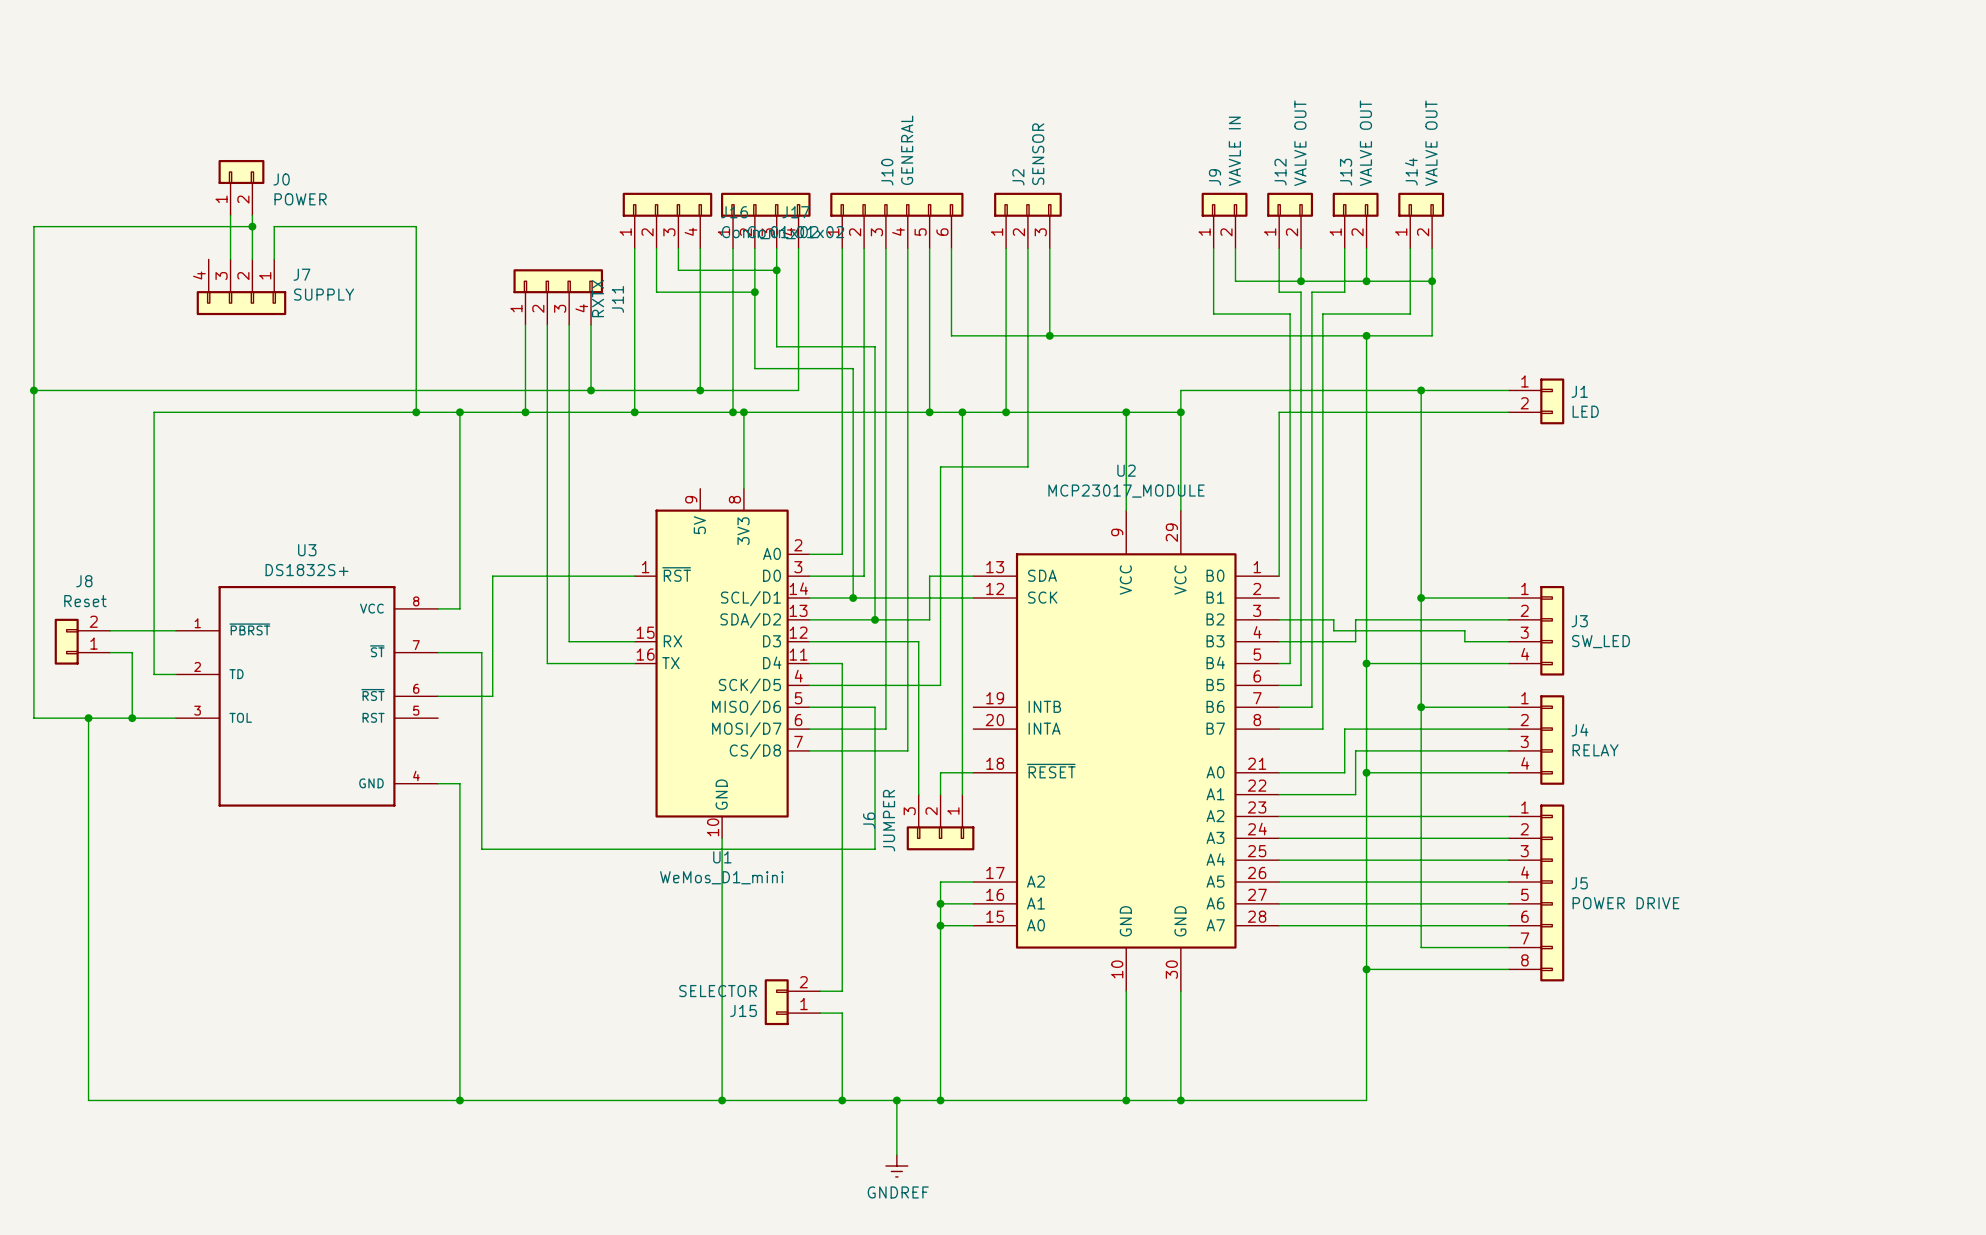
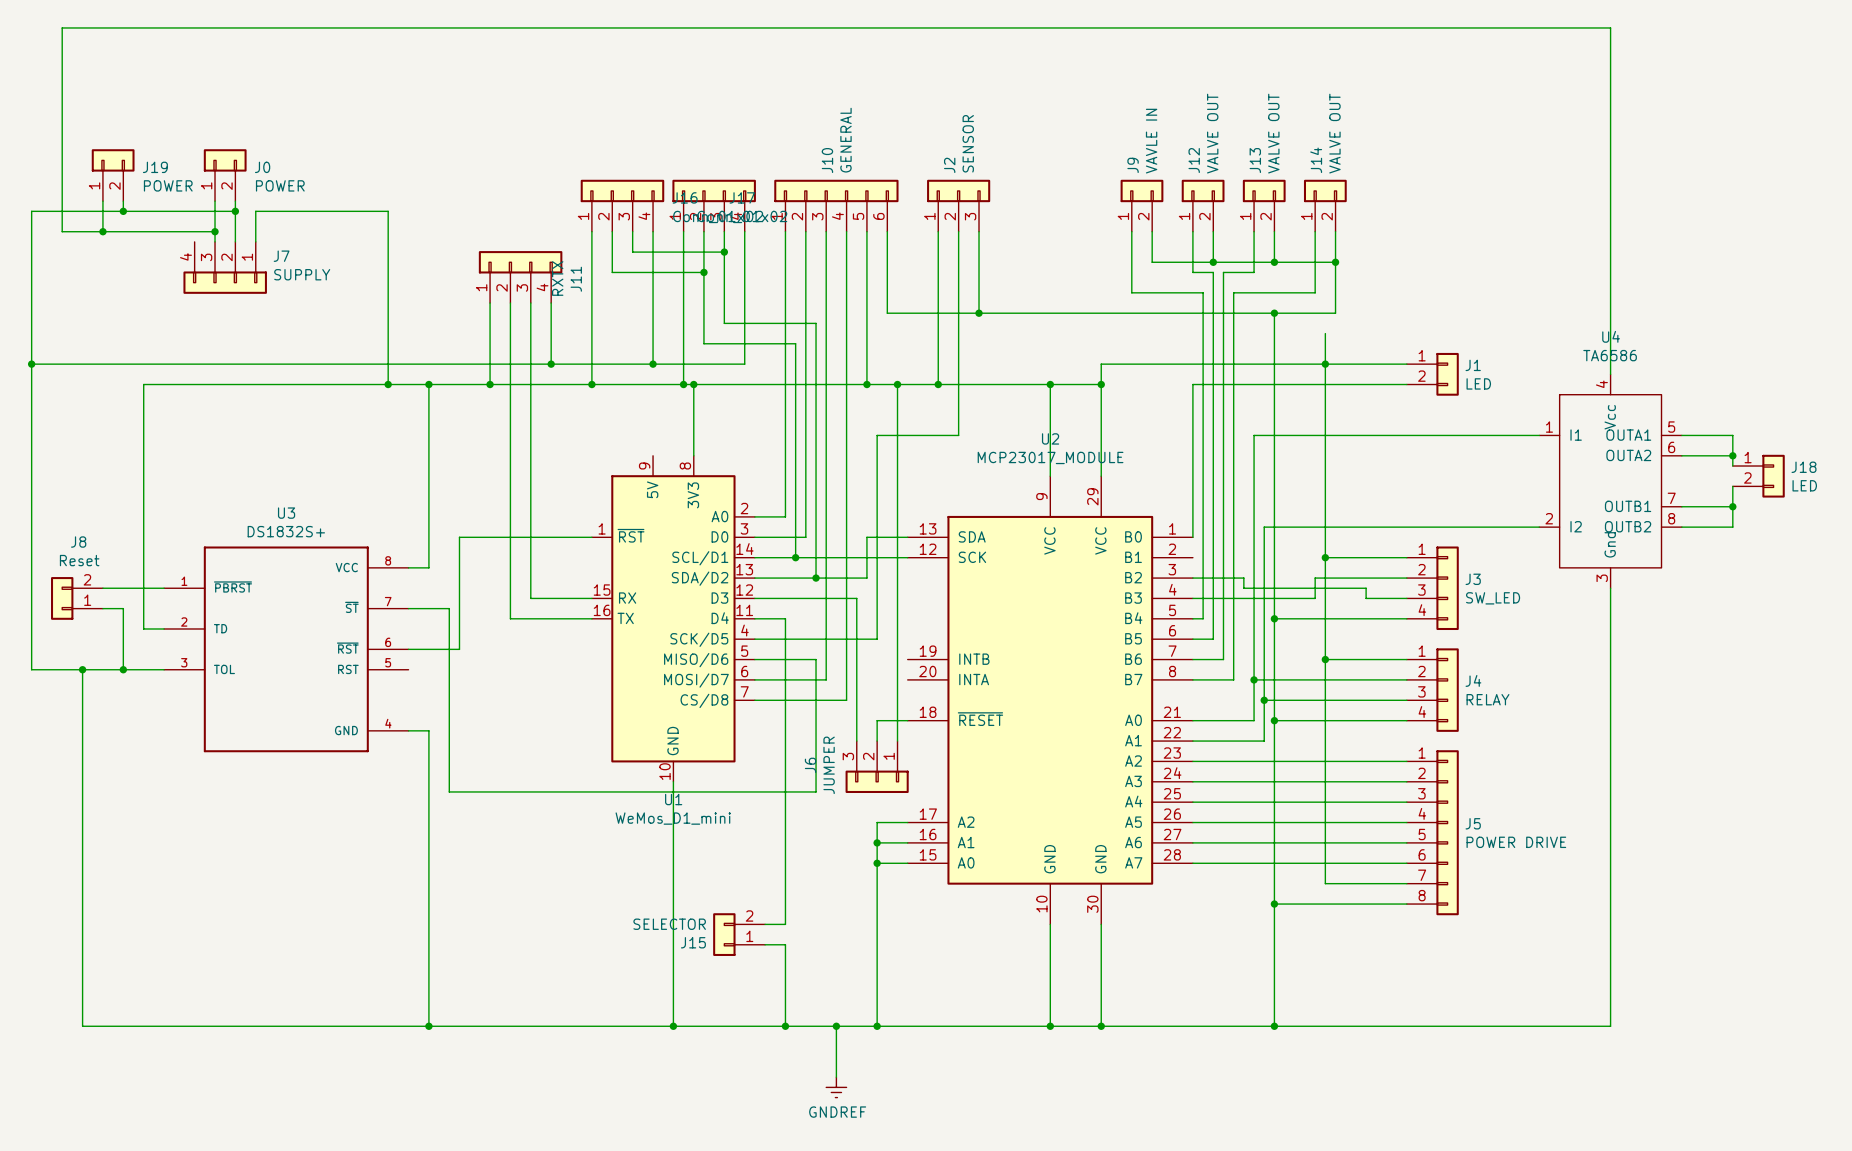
J19: none -> POWER (113, 175)
wire: none -> (102, 201) (102, 231)
wire: none -> (123, 201) (123, 211)
junction: none -> (123, 211)
junction: none -> (102, 231)
wire: none -> (215, 231) (62, 231) (62, 27) (1610, 27) (1610, 374)
junction: none -> (215, 231)
wire: none -> (1325, 333) (1325, 364)
wire: none -> (1539, 435) (1254, 435) (1254, 679)
wire: none -> (1681, 435) (1732, 435) (1732, 466)
wire: none -> (1681, 455) (1732, 455)
junction: none -> (1732, 455)
J18: none -> LED (1758, 476)
U4: none -> TA6586 (1610, 481)
wire: none -> (1732, 486) (1732, 527) (1681, 527)
wire: none -> (1681, 506) (1732, 506)
junction: none -> (1732, 506)
wire: none -> (1539, 527) (1264, 527) (1264, 578)
wire: (1355, 619) (1410, 619) -> (1264, 700) (1264, 598) (1315, 598) (1315, 578)
wire: none -> (1610, 588) (1610, 1026) (1274, 1026)
junction: none -> (1254, 679)
junction: none -> (1264, 700)
junction: none -> (1274, 1026)

